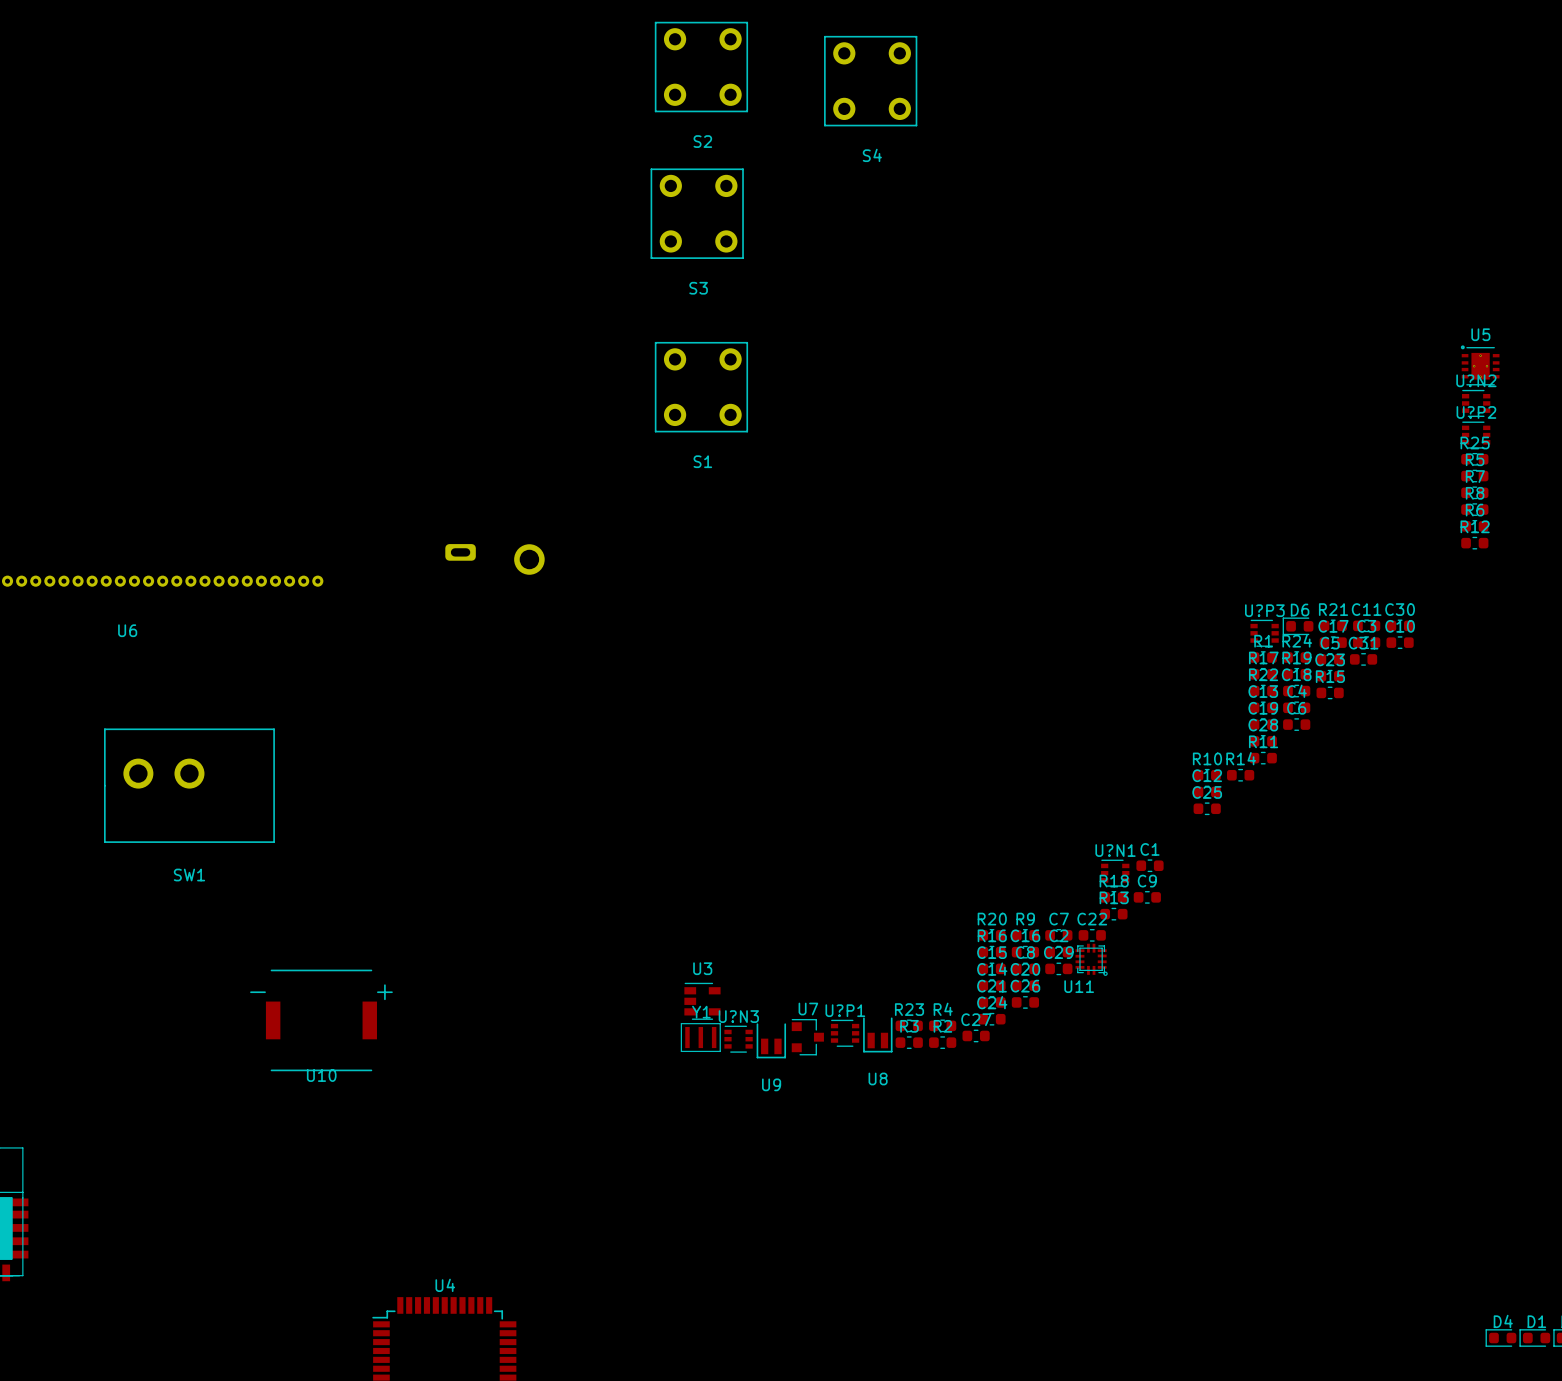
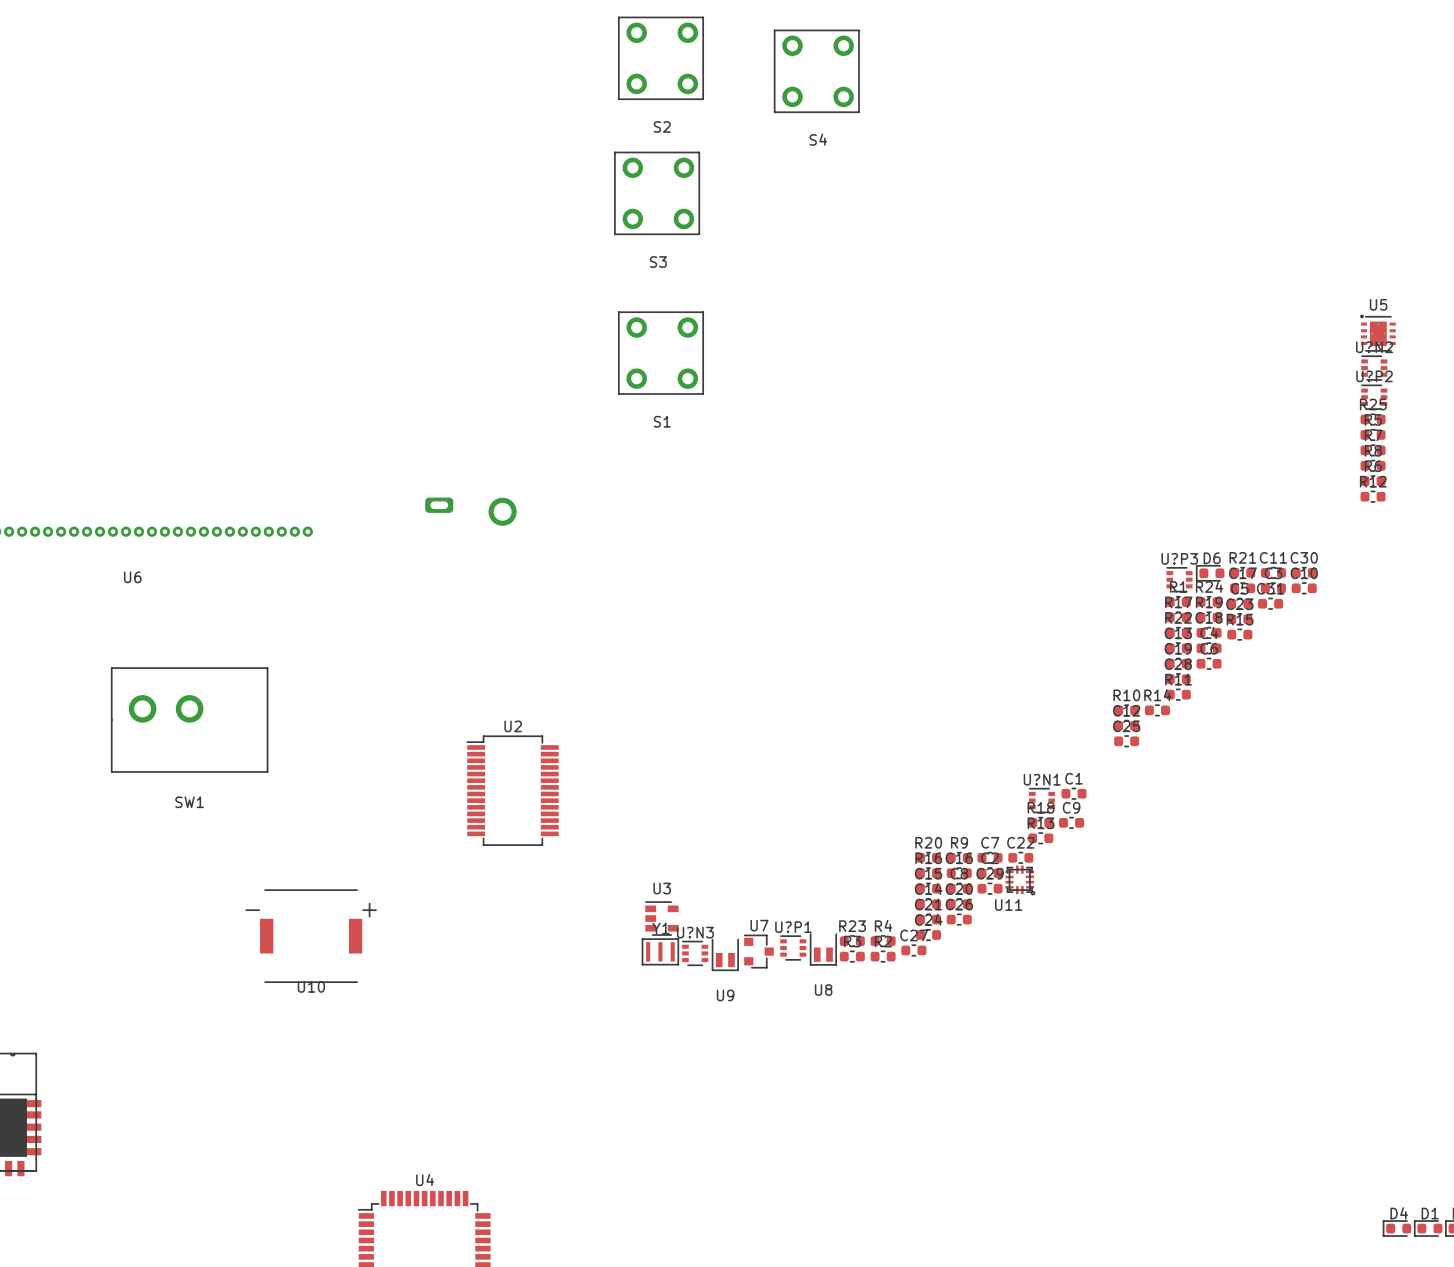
U2: none -> (512, 790)

